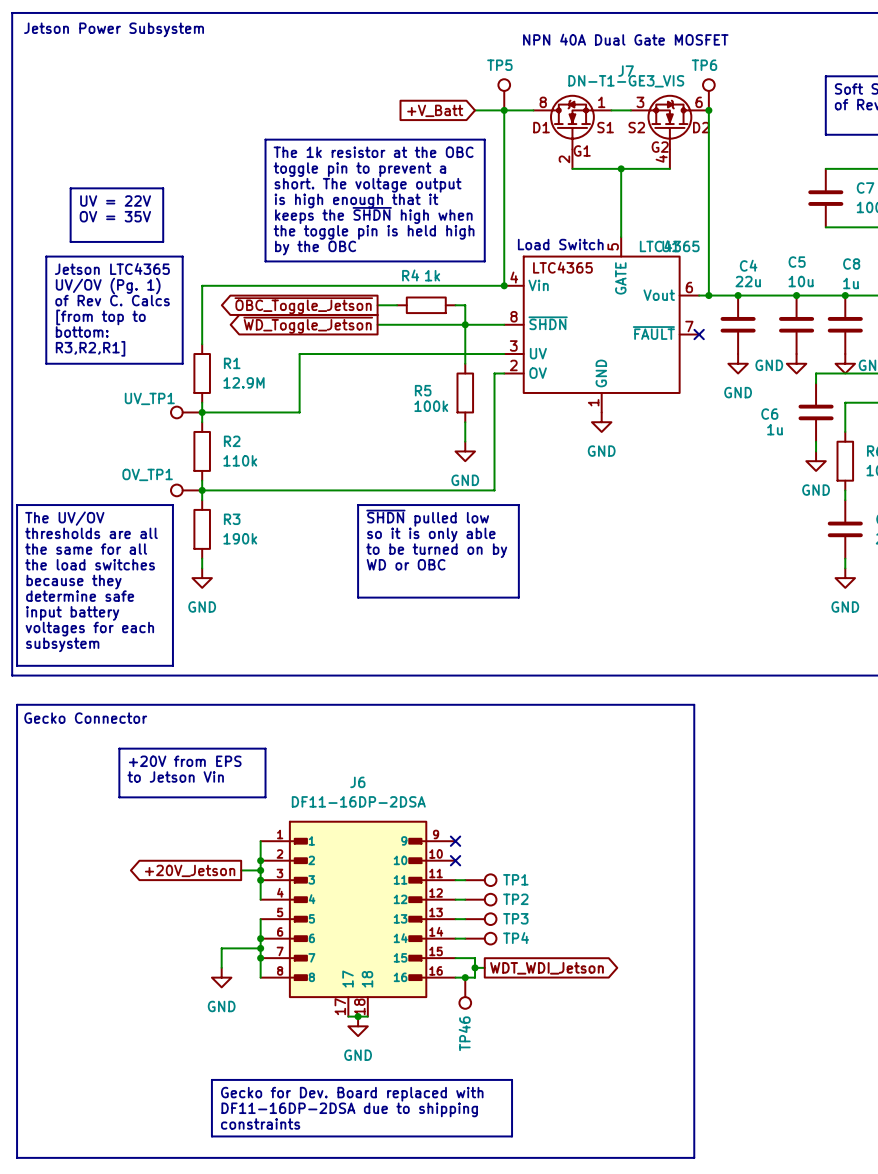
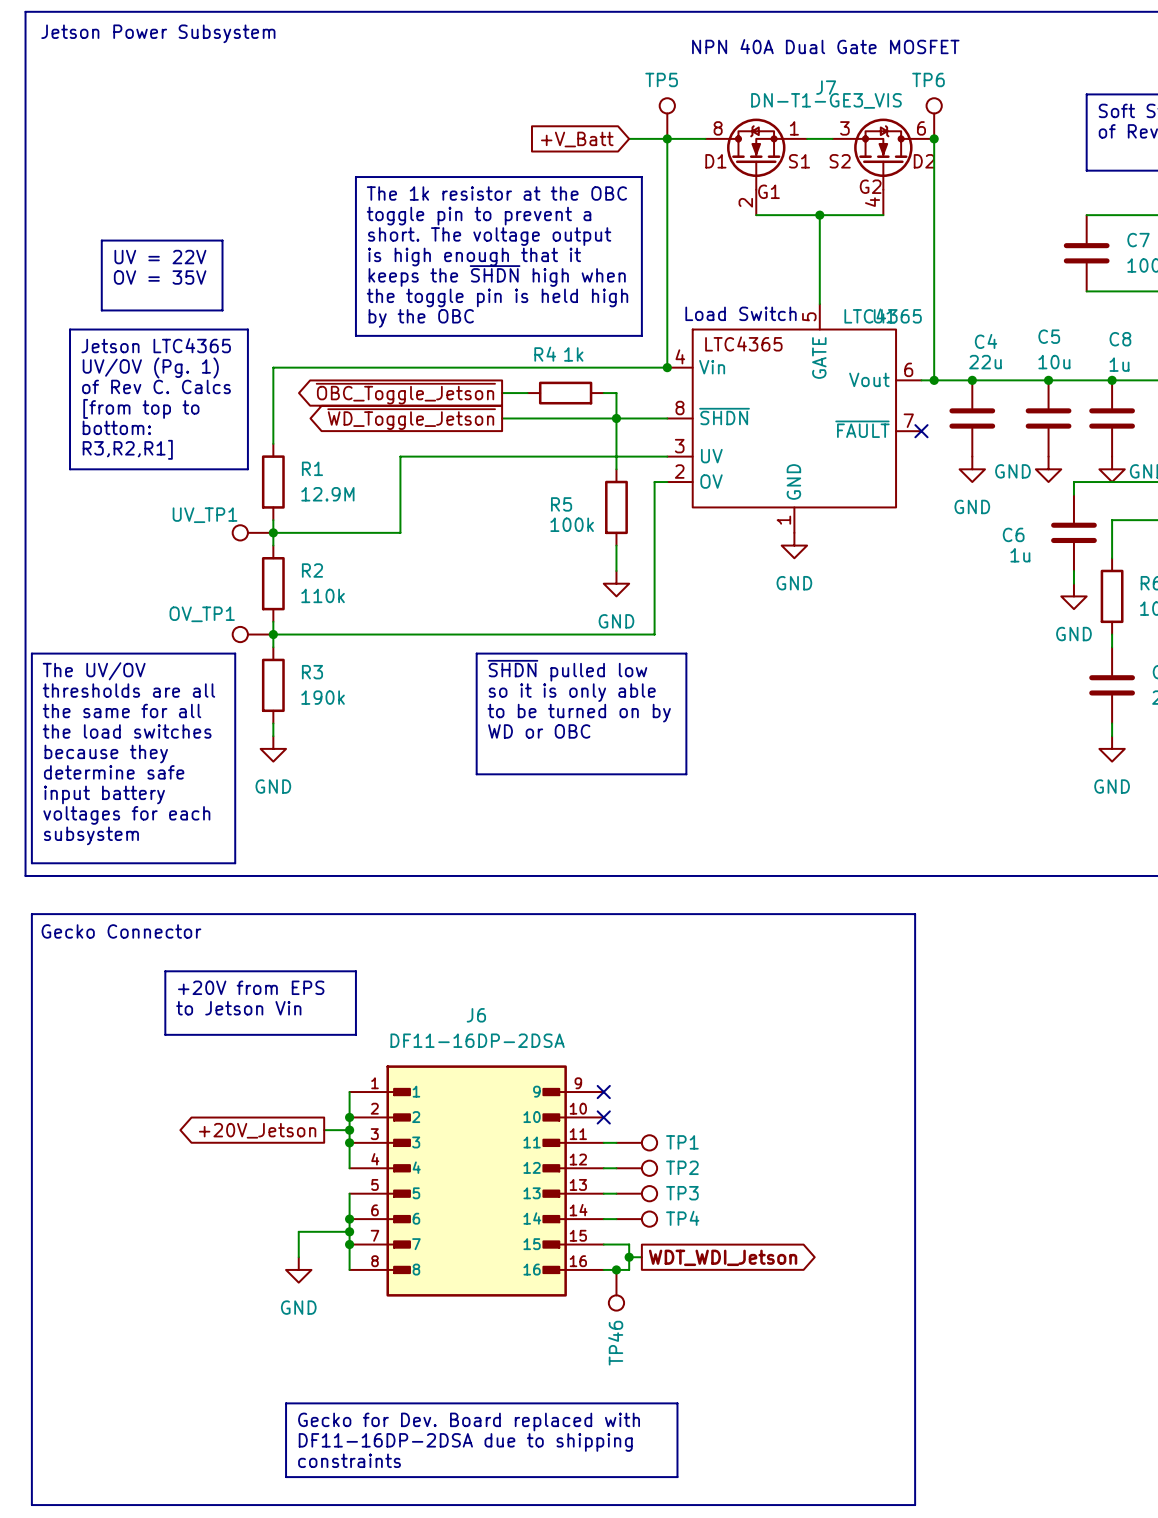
J6 symbol: [260, 820, 456, 1017] -> [349, 1065, 604, 1297]
wire: (348, 1016) (367, 1016) -> none
junction: (358, 1016) -> none
power symbol: GND (358, 1026) -> none

